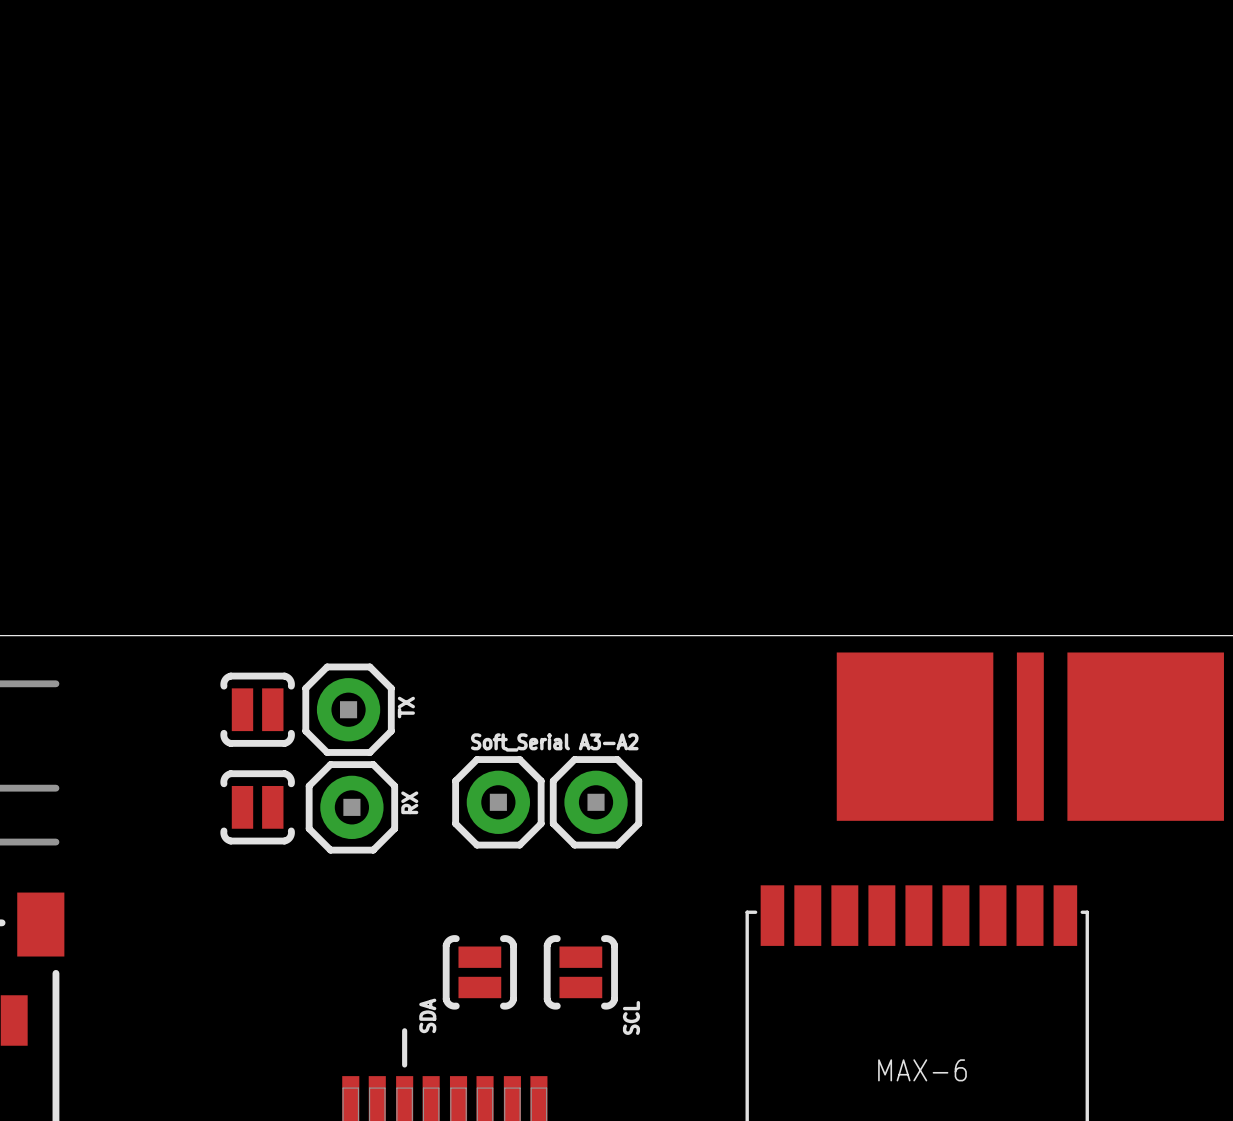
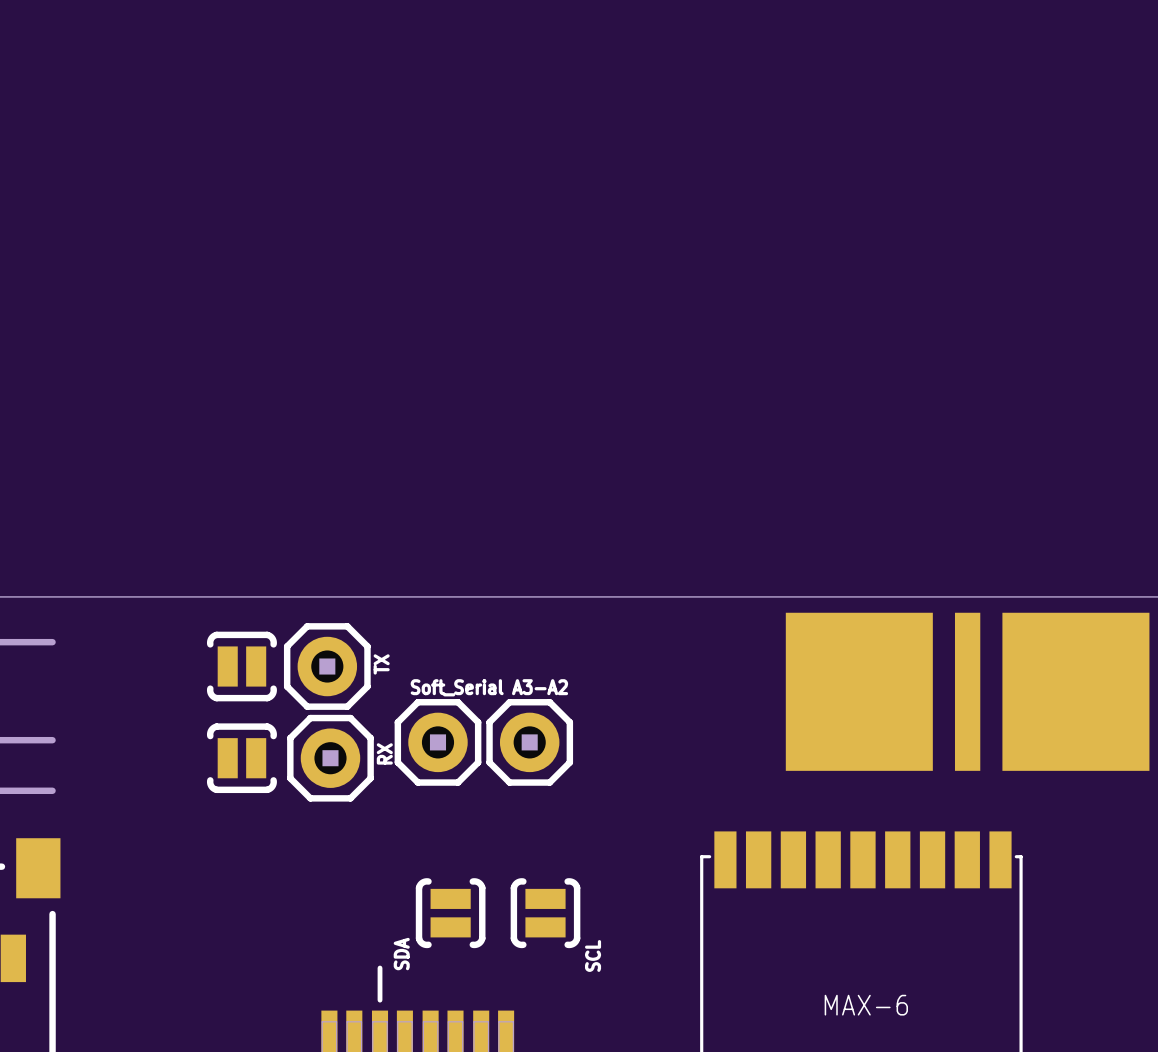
text position: Soft_Serial A3-A2 (554, 742) -> Soft_Serial A3-A2 (489, 687)
part: none -> (437, 742)
part: none -> (529, 742)
part: (498, 802) -> none
part: (596, 802) -> none

